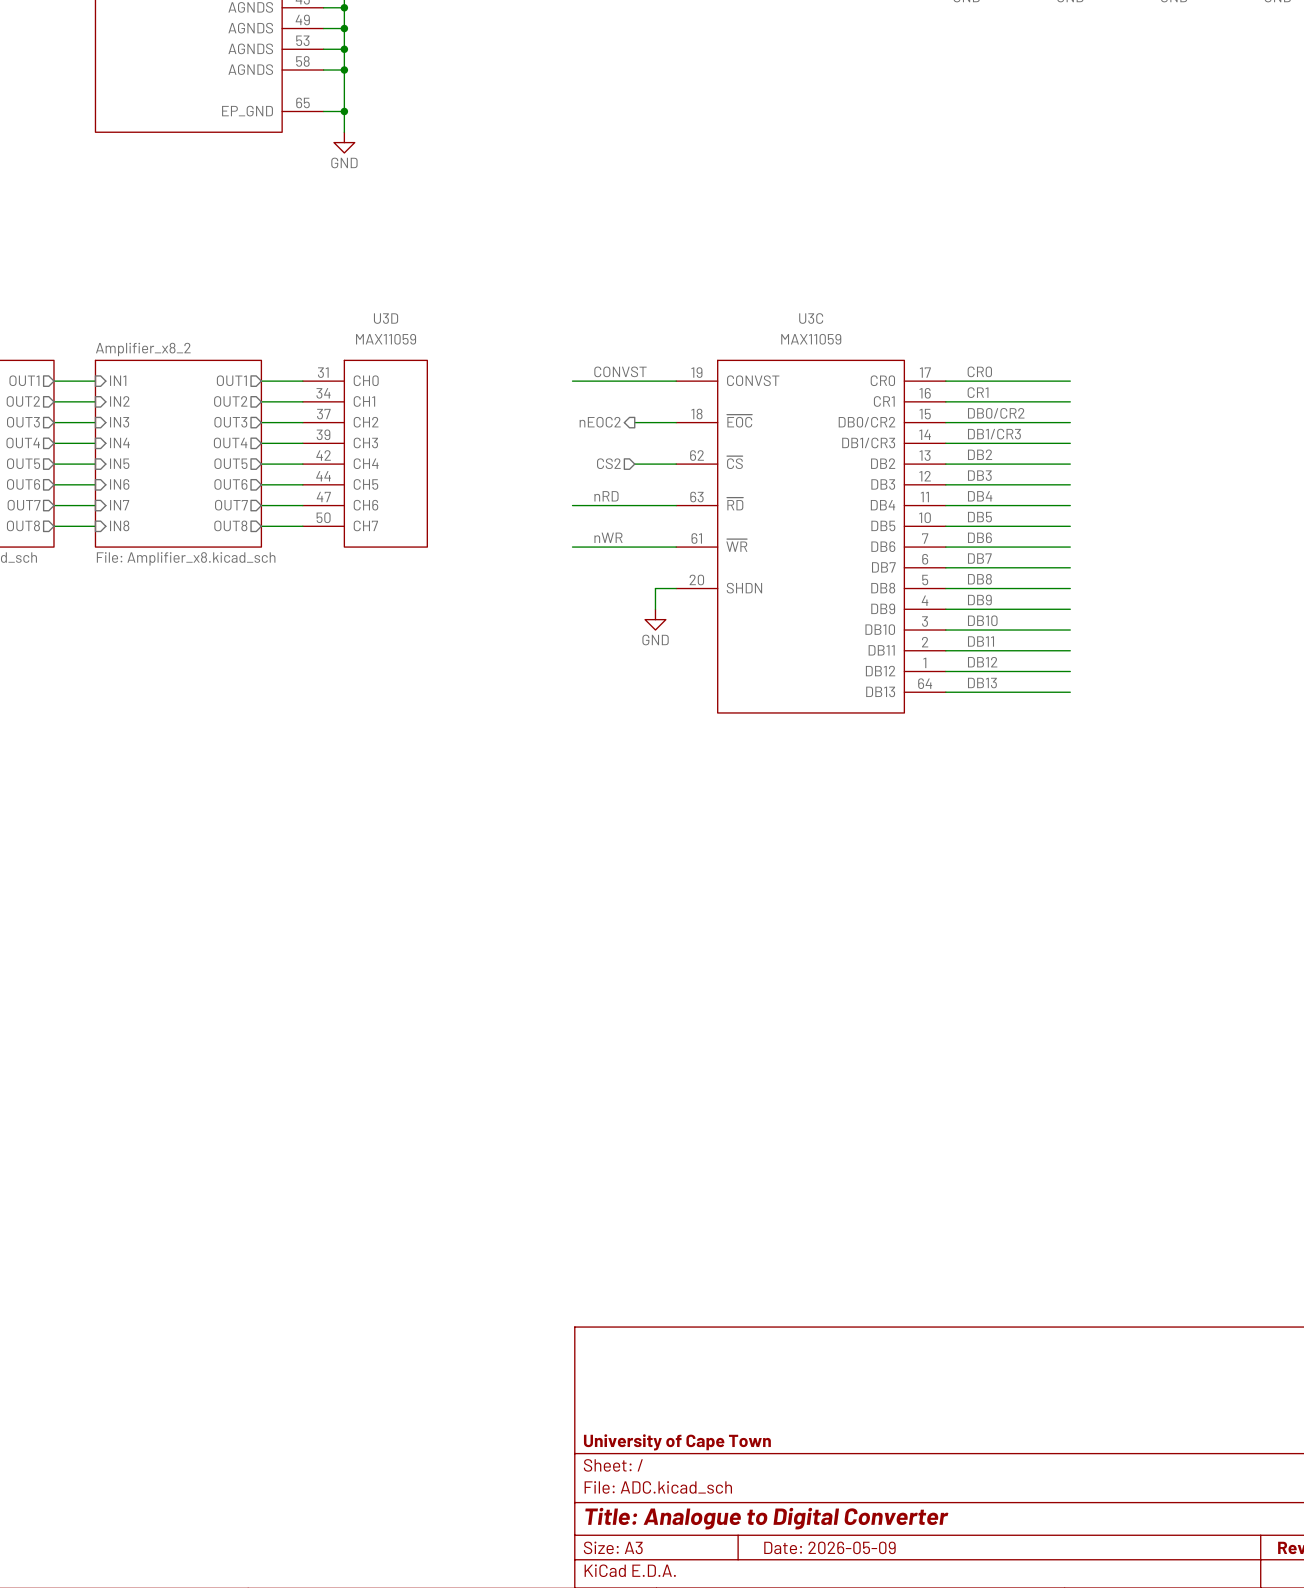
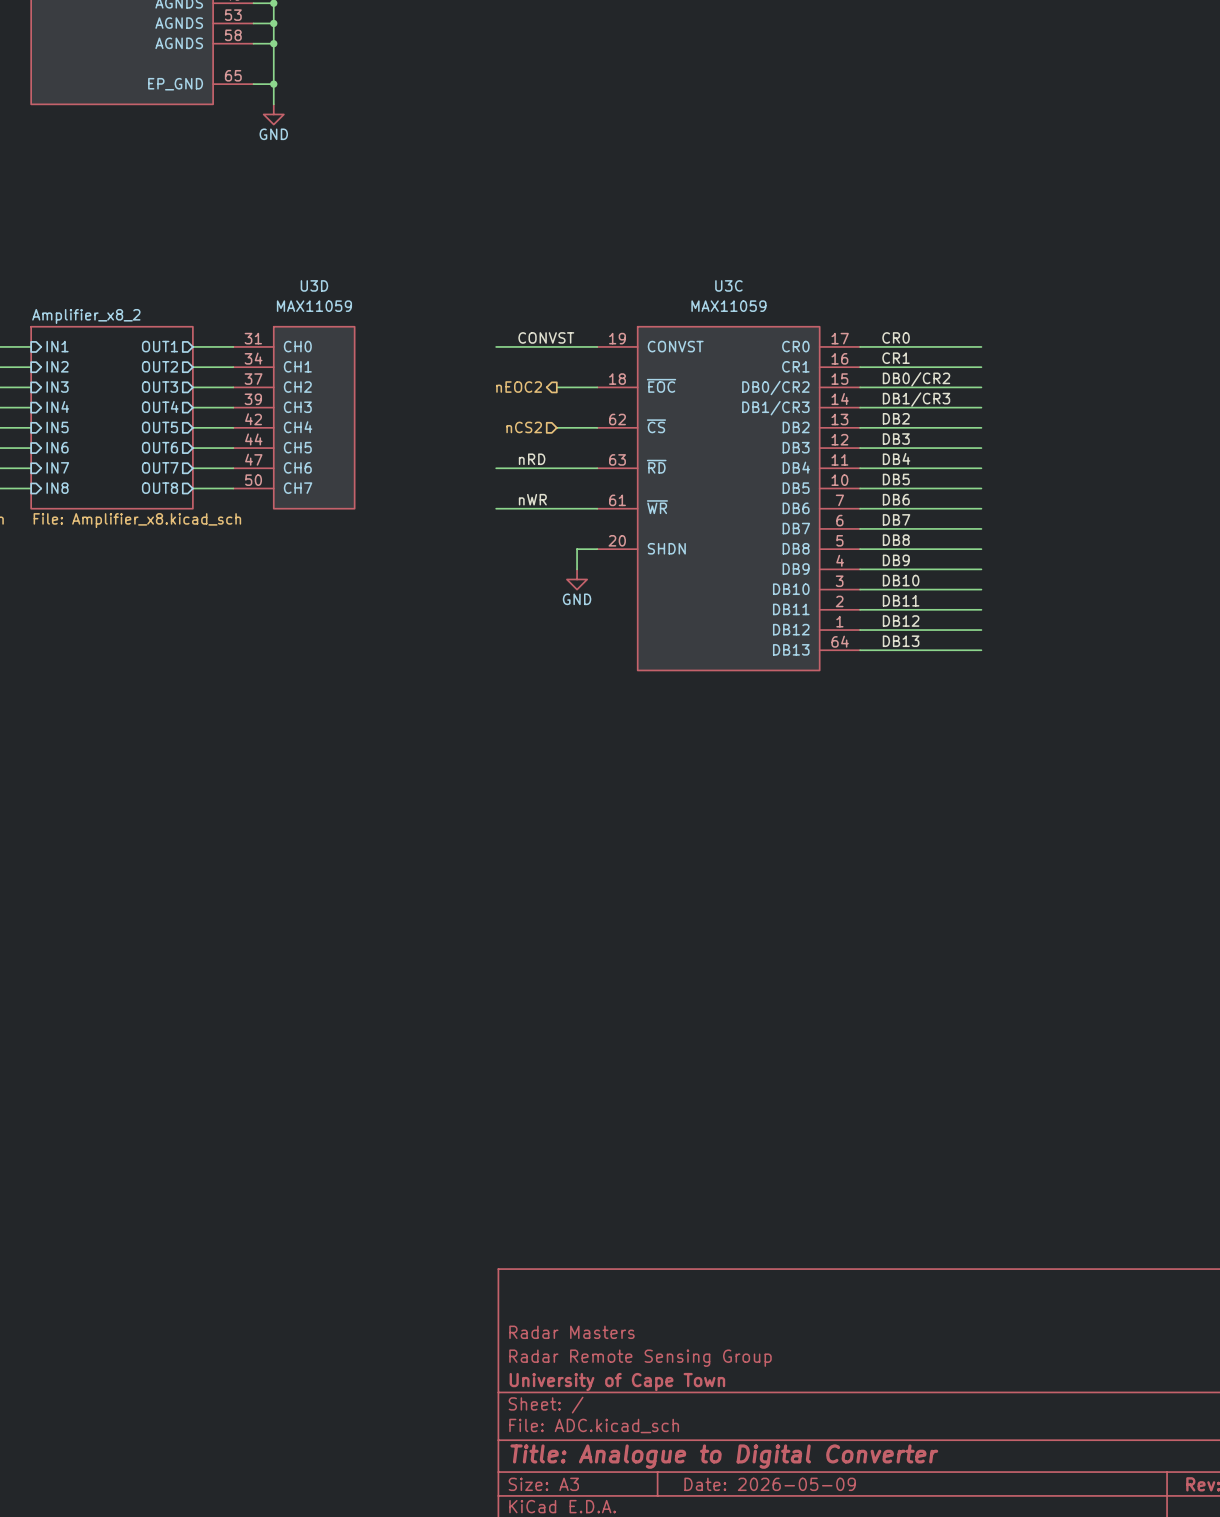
hierarchical label: CS2 (608, 463) -> nCS2 (524, 427)
title block: none -> Radar Masters (571, 1332)
title block: none -> Radar Remote Sensing Group (640, 1358)

